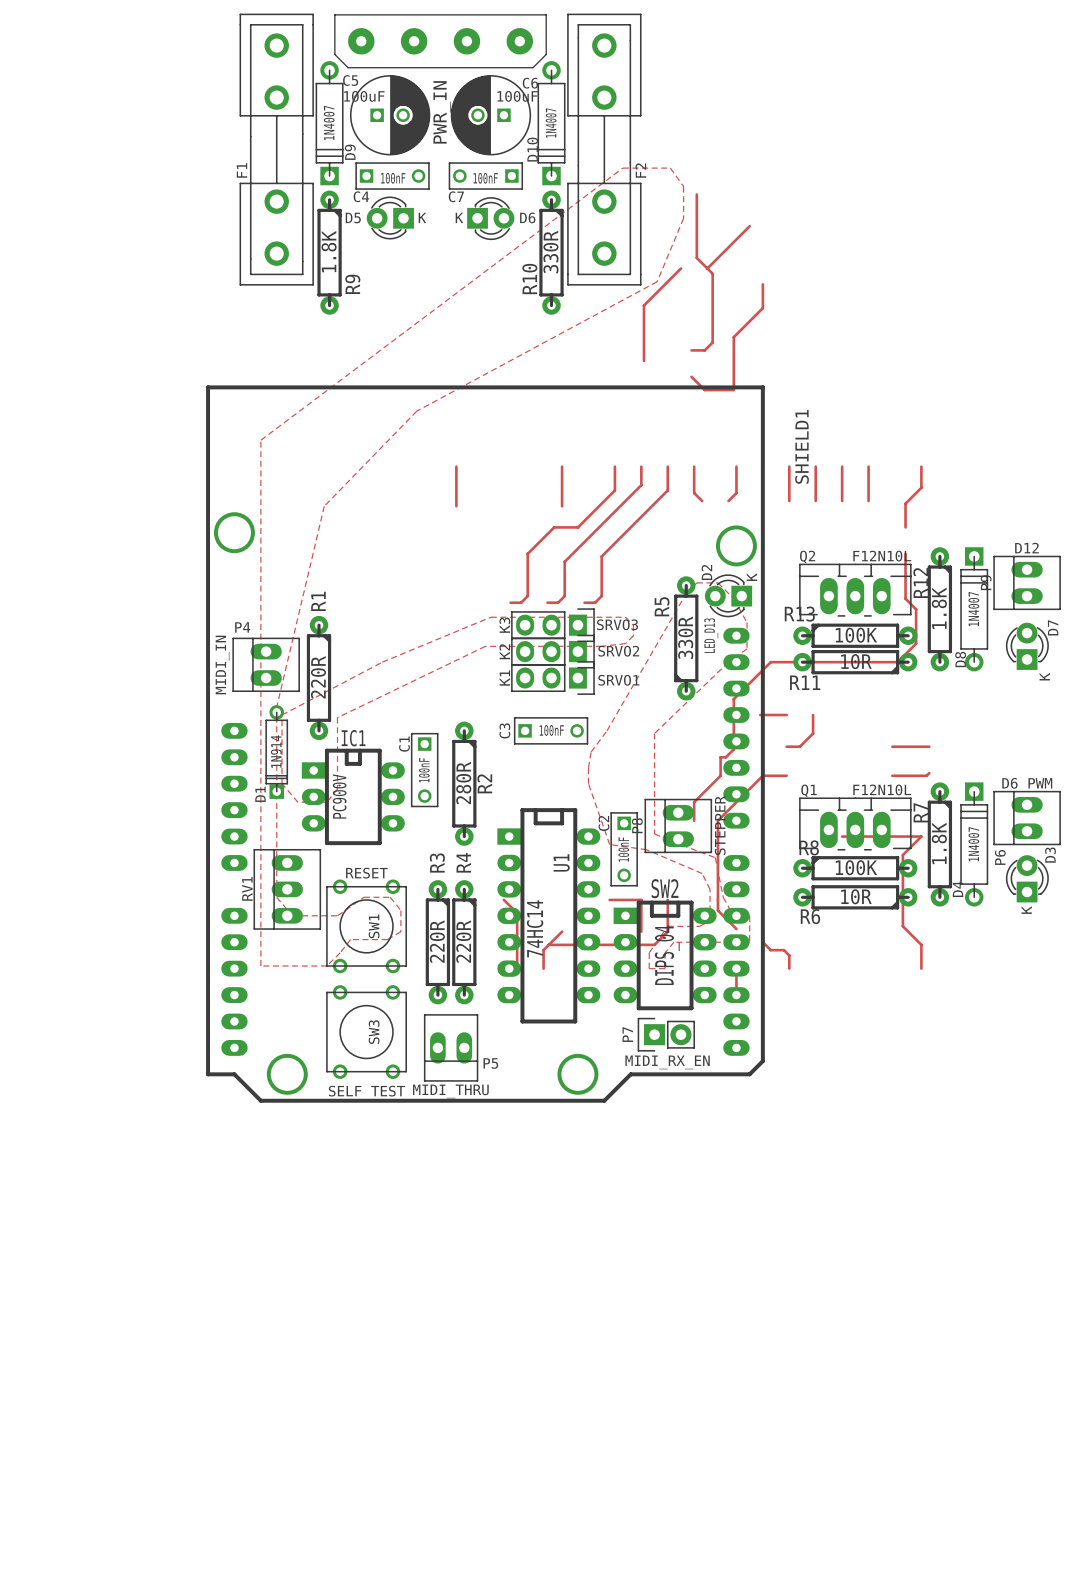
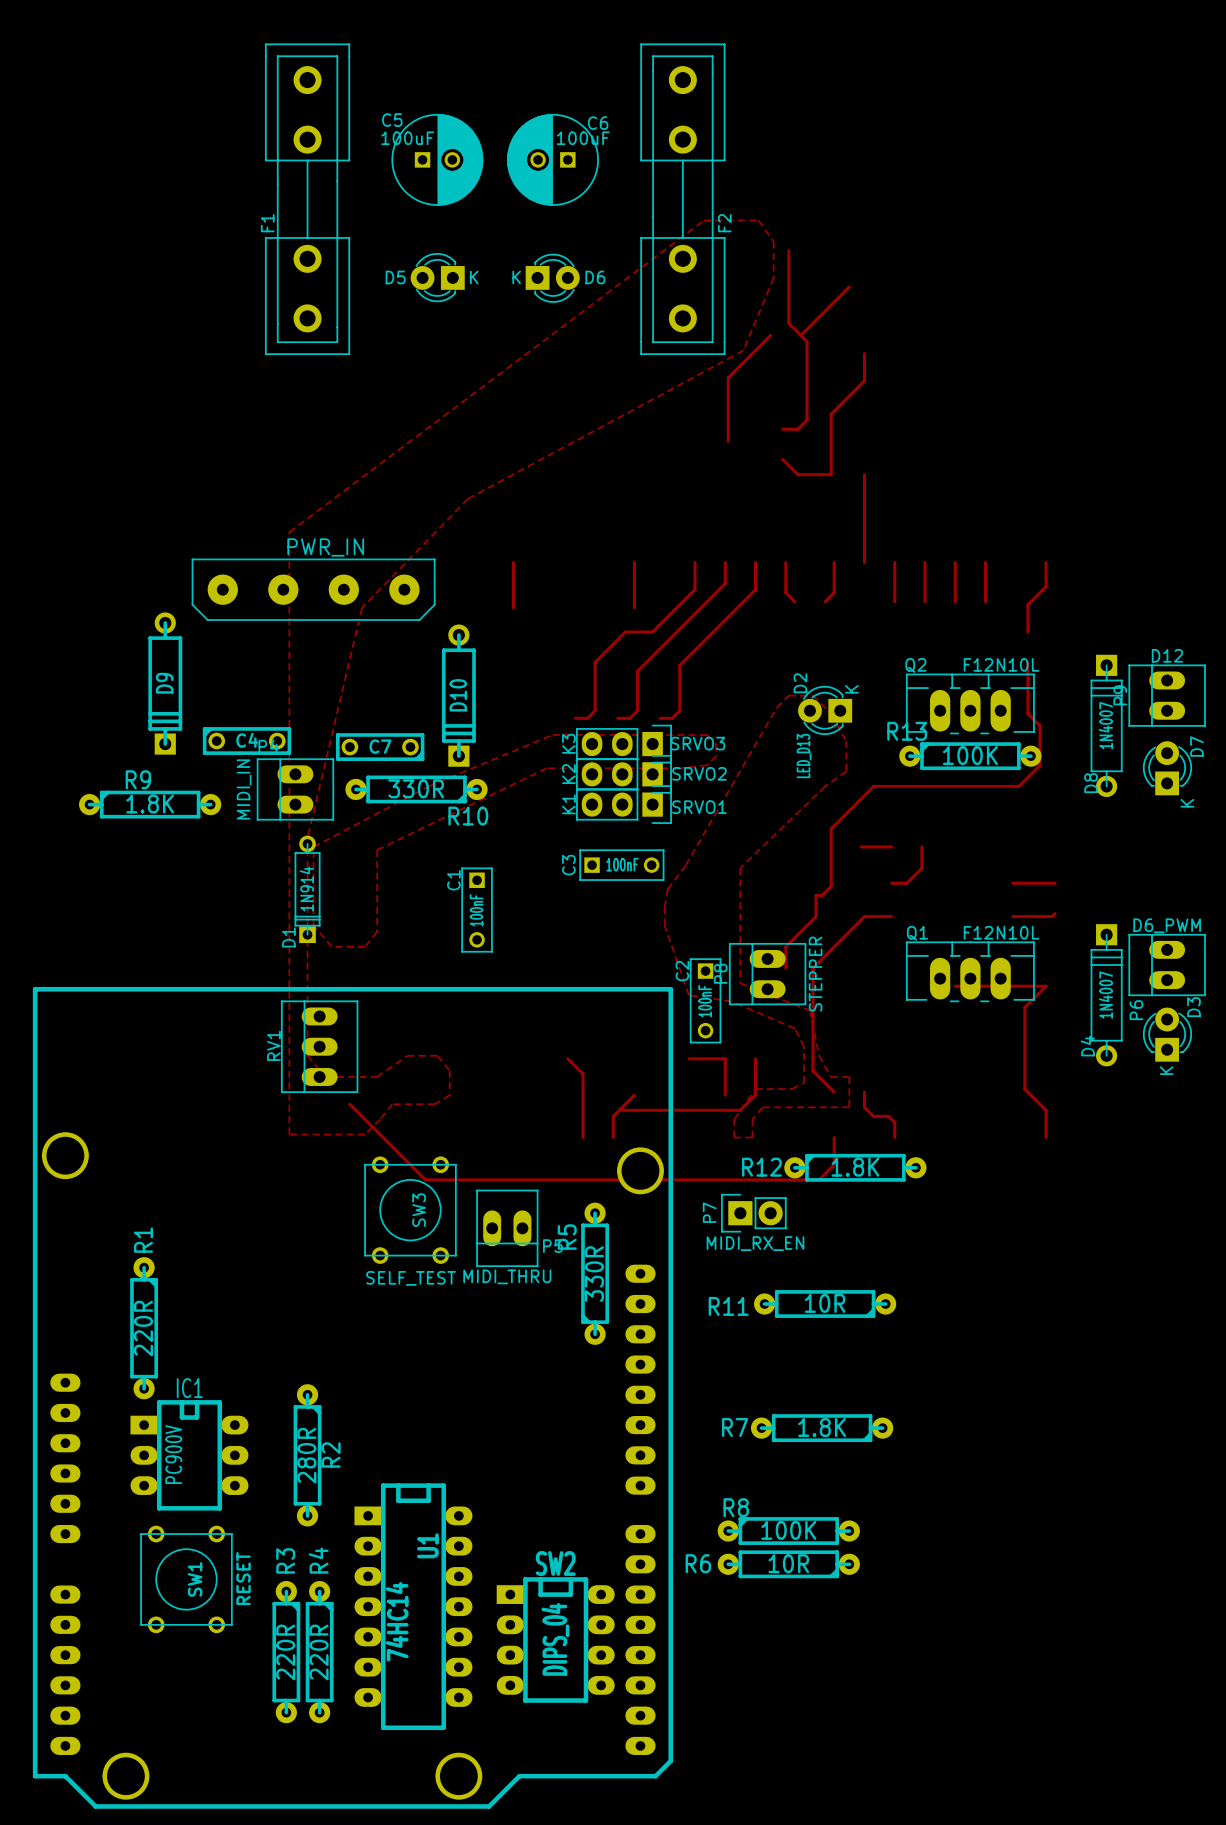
part: PWR_IN (440, 41) -> none
D9 footprint: [315, 61, 344, 186] -> [148, 612, 183, 755]
D10 footprint: [537, 61, 566, 186] -> [441, 624, 476, 767]
D9 value: 1N4007 (329, 122) -> none
D10 value: 1N4007 (551, 122) -> none
D10 name position: D10 (532, 149) -> D10 (458, 695)
D9 name position: D9 (350, 152) -> D9 (164, 683)
C4 footprint: [355, 162, 430, 190] -> [202, 727, 292, 755]
C7 footprint: [448, 162, 524, 190] -> [335, 733, 425, 762]
C4 value: 100nF (393, 178) -> none
C7 value: 100nF (485, 178) -> none
C4 name position: C4 (361, 196) -> C4 (247, 740)
C7 name position: C7 (456, 196) -> C7 (380, 746)
R9 rotation: 0° (329, 252) -> 90° counterclockwise (150, 804)
R9 position: (329, 252) -> (150, 804)
R10 rotation: 0° (551, 252) -> 90° clockwise (416, 789)
R10 position: (551, 252) -> (416, 789)
R10 name position: R10 (529, 279) -> R10 (468, 816)
R9 name position: R9 (352, 284) -> R9 (138, 779)
part: none -> PWR_IN (313, 589)
R12 name position: R12 (920, 583) -> R12 (761, 1167)
R12 rotation: 0° (939, 609) -> 90° counterclockwise (855, 1167)
R12 position: (939, 609) -> (855, 1167)
R5 position: (686, 638) -> (595, 1273)
R11 position: (855, 662) -> (825, 1304)
R1 position: (319, 678) -> (144, 1328)
R11 name position: R11 (805, 682) -> R11 (728, 1306)
SHIELD1: (485, 744) -> none
R2 position: (464, 783) -> (307, 1455)
IC1 position: (353, 796) -> (189, 1455)
R7 name position: R7 (920, 812) -> R7 (735, 1427)
R7 rotation: 0° (939, 844) -> 90° clockwise (822, 1428)
R7 position: (939, 844) -> (822, 1428)
R8 position: (855, 868) -> (788, 1531)
SW1 value position: RESET (366, 873) -> RESET (243, 1578)
SW1 footprint: [326, 879, 407, 974] -> [140, 1525, 233, 1634]
R6 position: (855, 897) -> (788, 1564)
U1 position: (548, 915) -> (413, 1606)
R6 name position: R6 (810, 916) -> R6 (698, 1563)
track: none -> (349, 1104) (425, 1179) (819, 1179) (834, 1164)
R3 position: (437, 942) -> (286, 1652)
R4 position: (464, 942) -> (319, 1652)
SW2 position: (665, 955) -> (555, 1639)
part: none -> (352, 1397)

